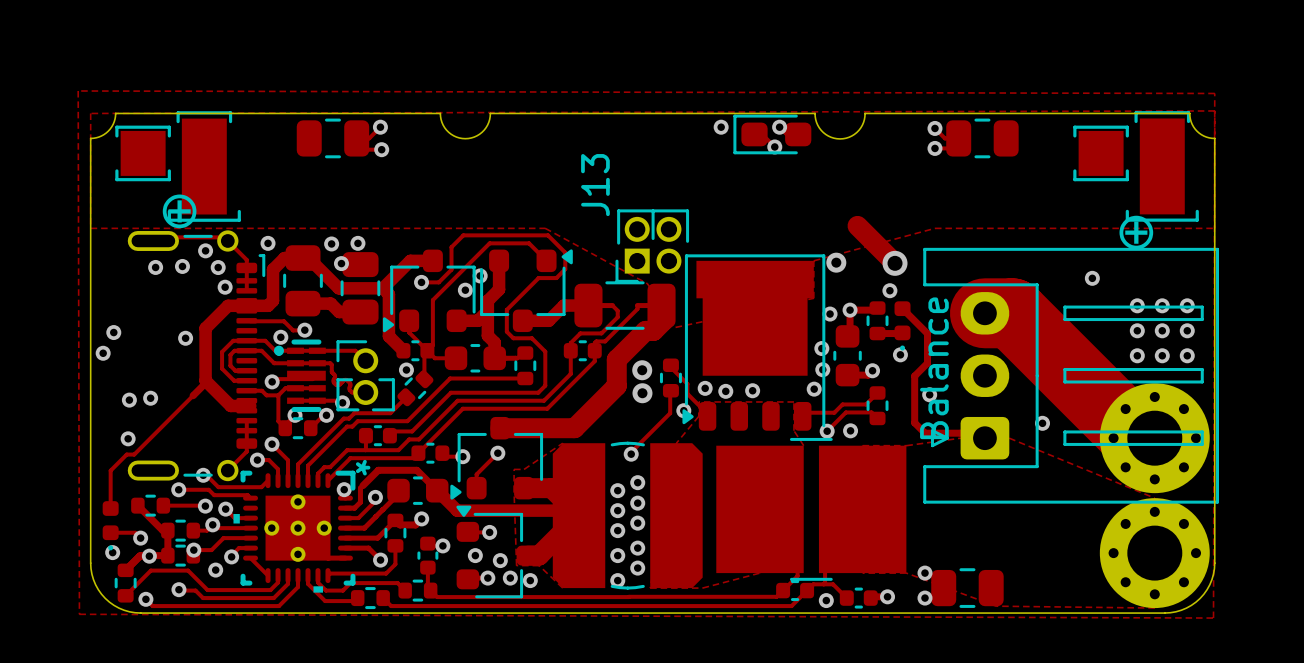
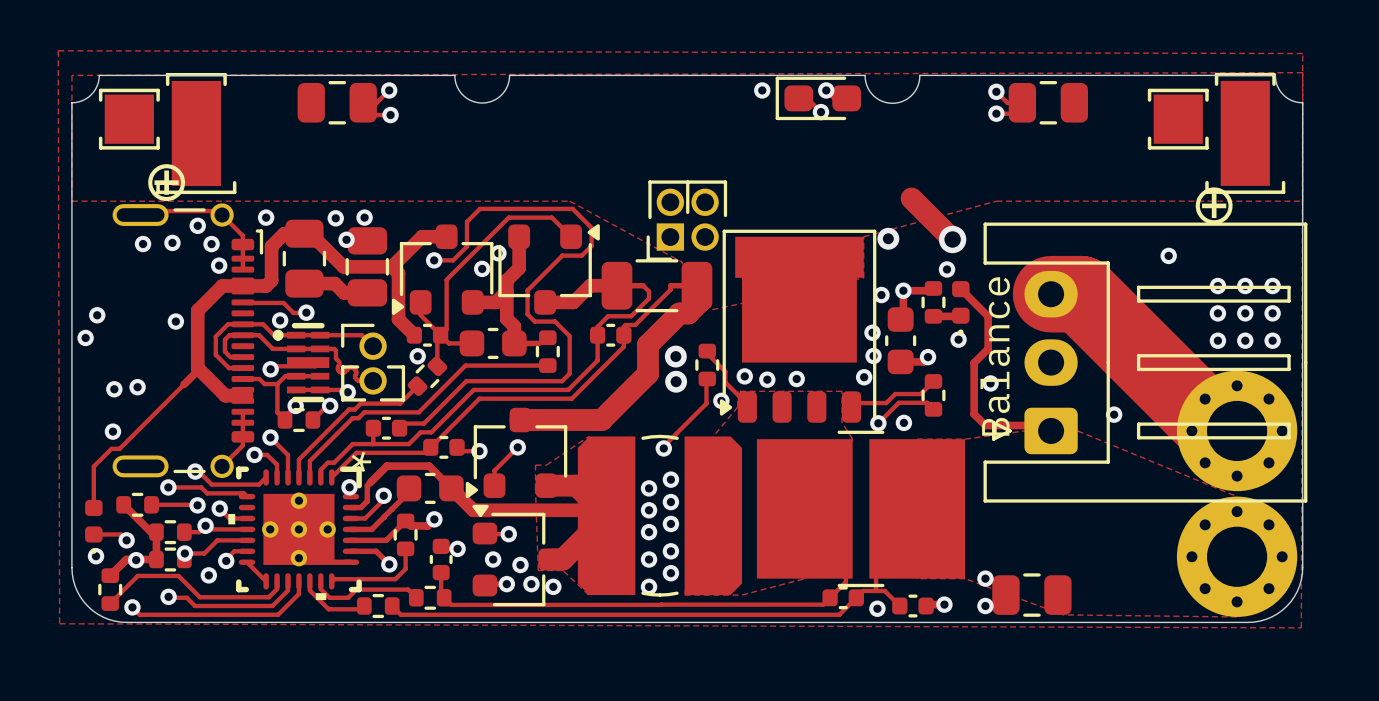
J13 name: J13 (595, 185) -> none

